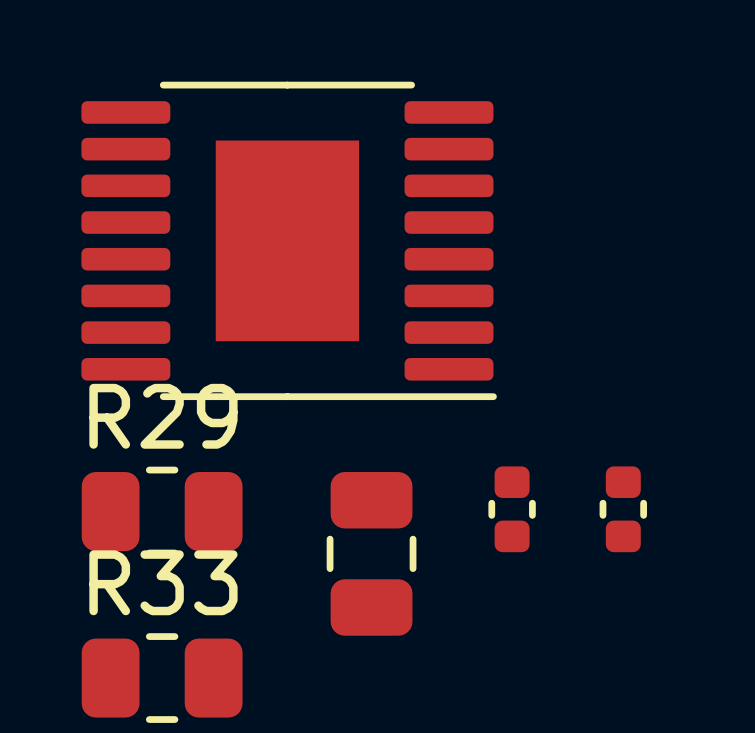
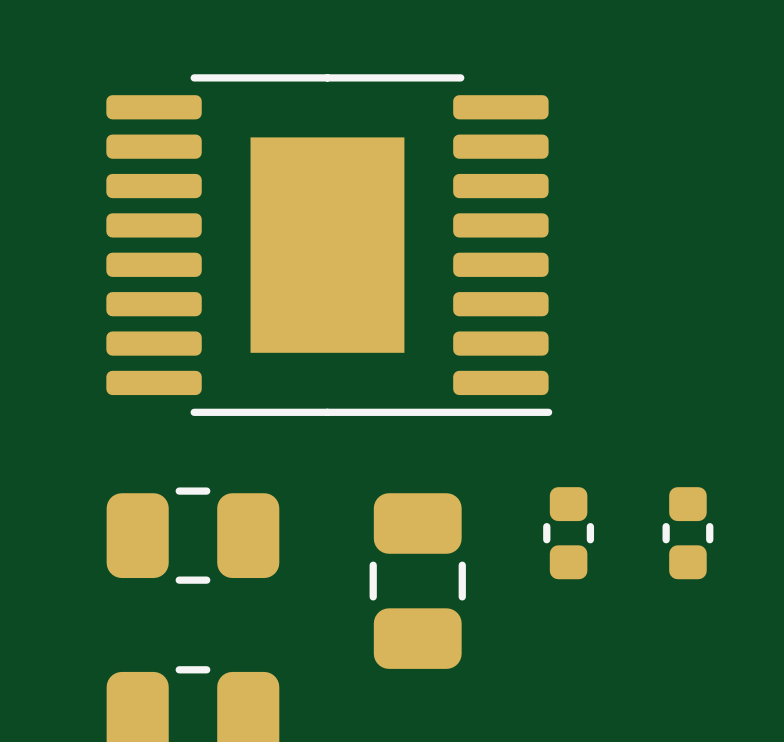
R29 name: R29 (163, 416) -> none
R33 name: R33 (163, 582) -> none

